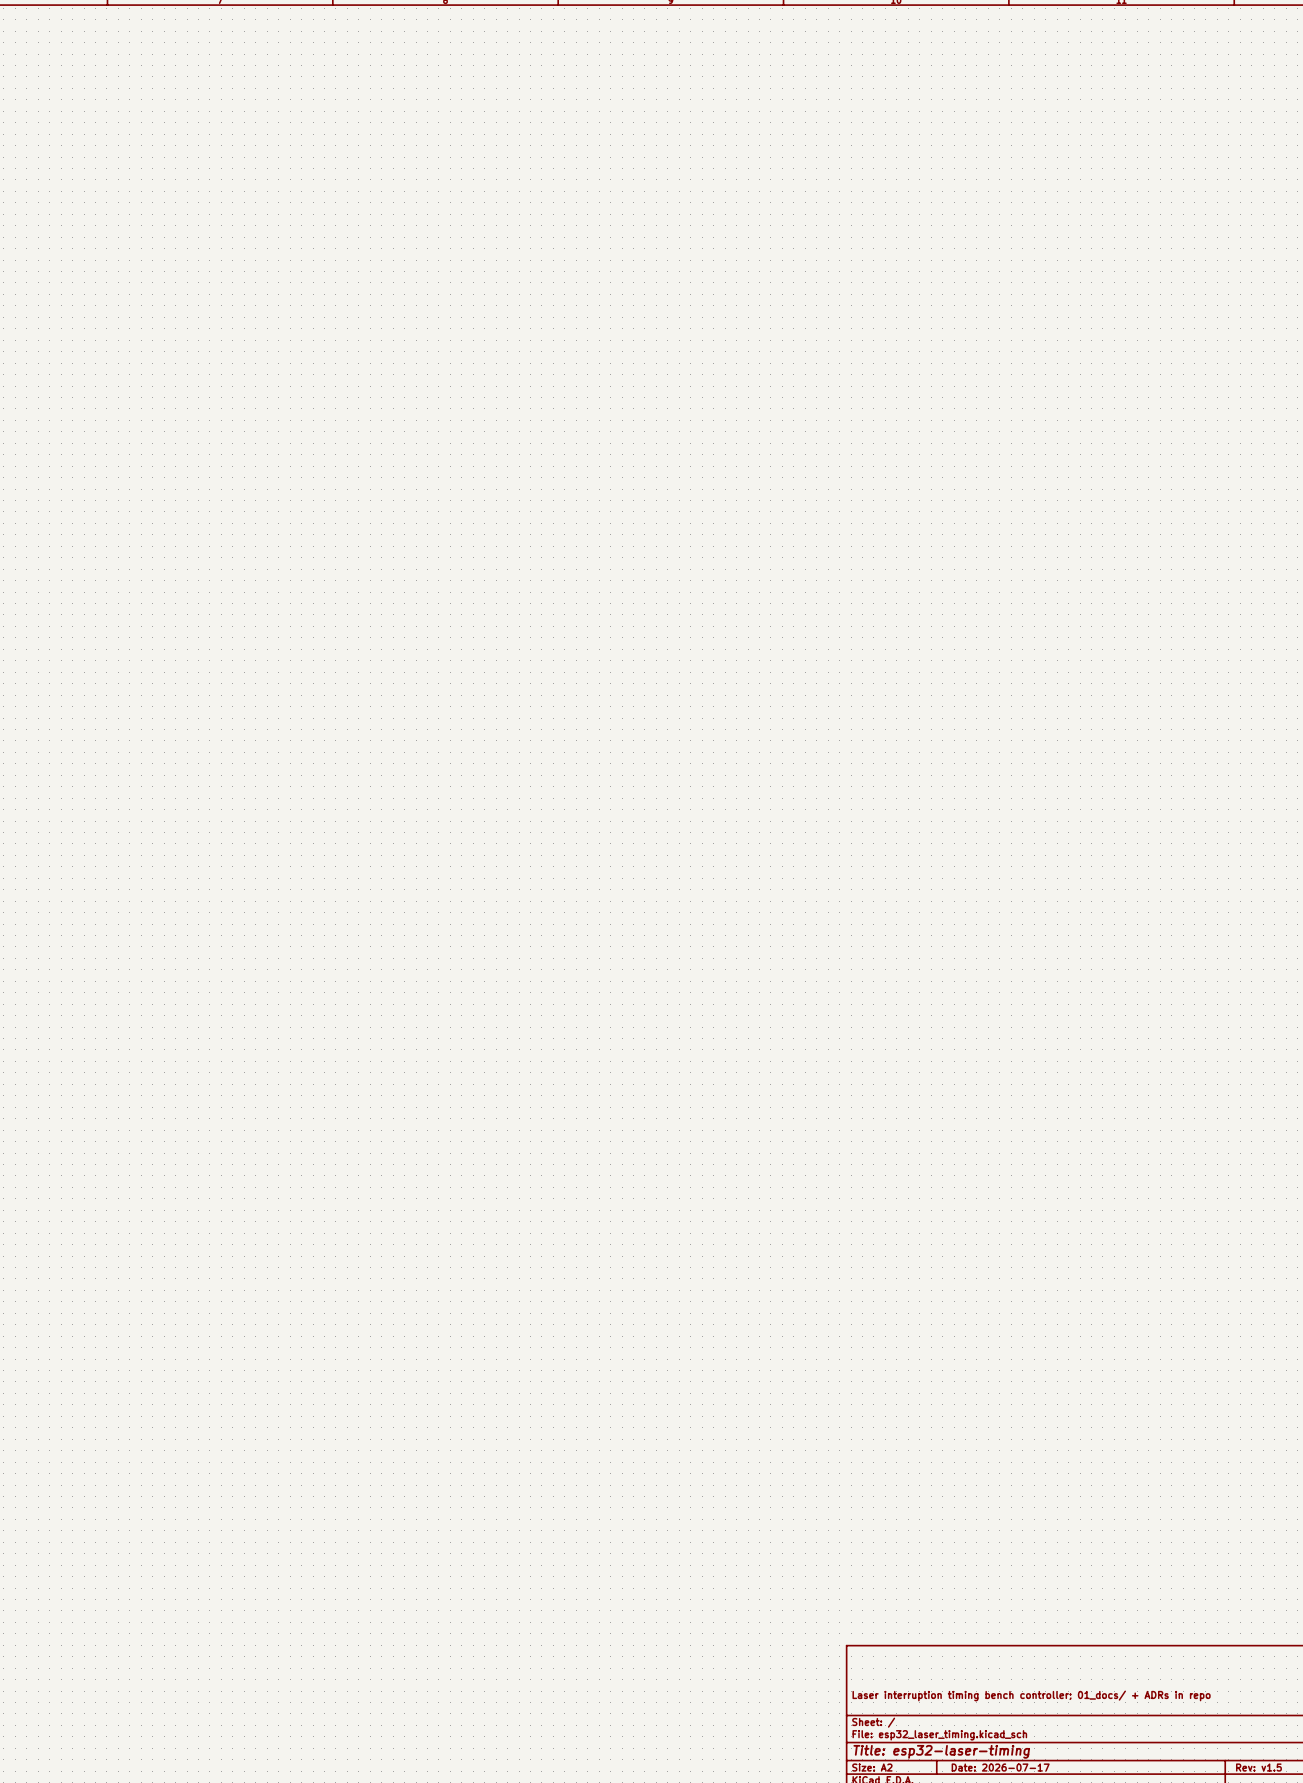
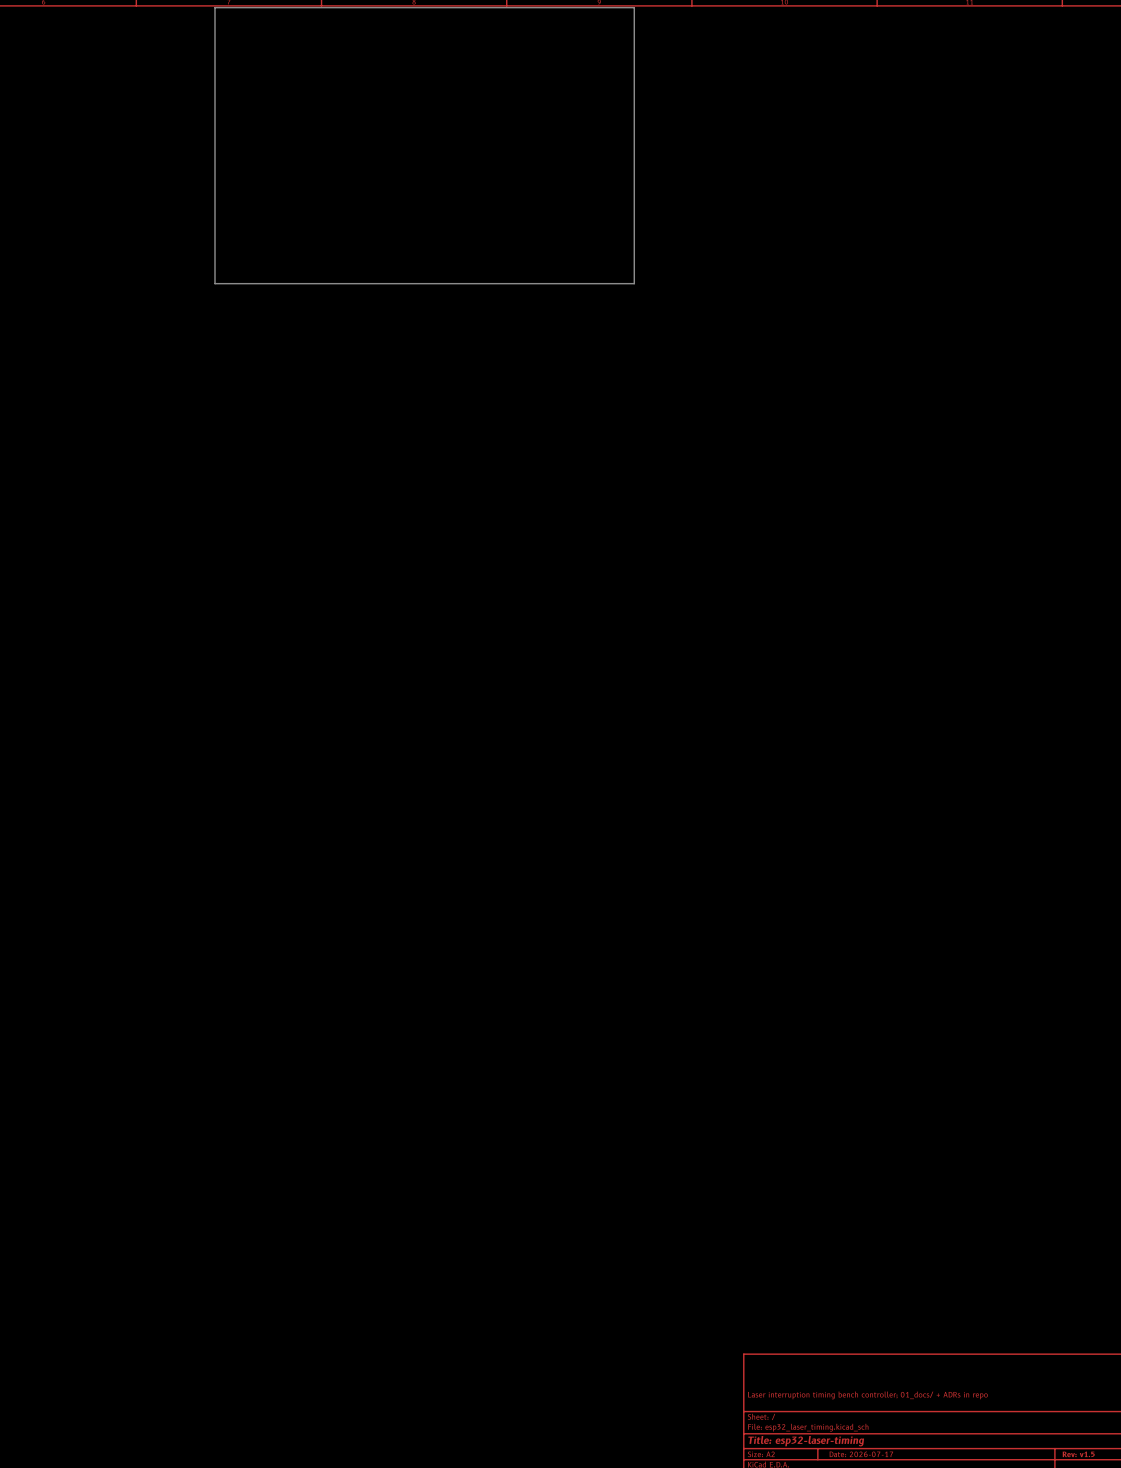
line: none -> (215, 7) (634, 7) (634, 283) (215, 283) (215, 7)

